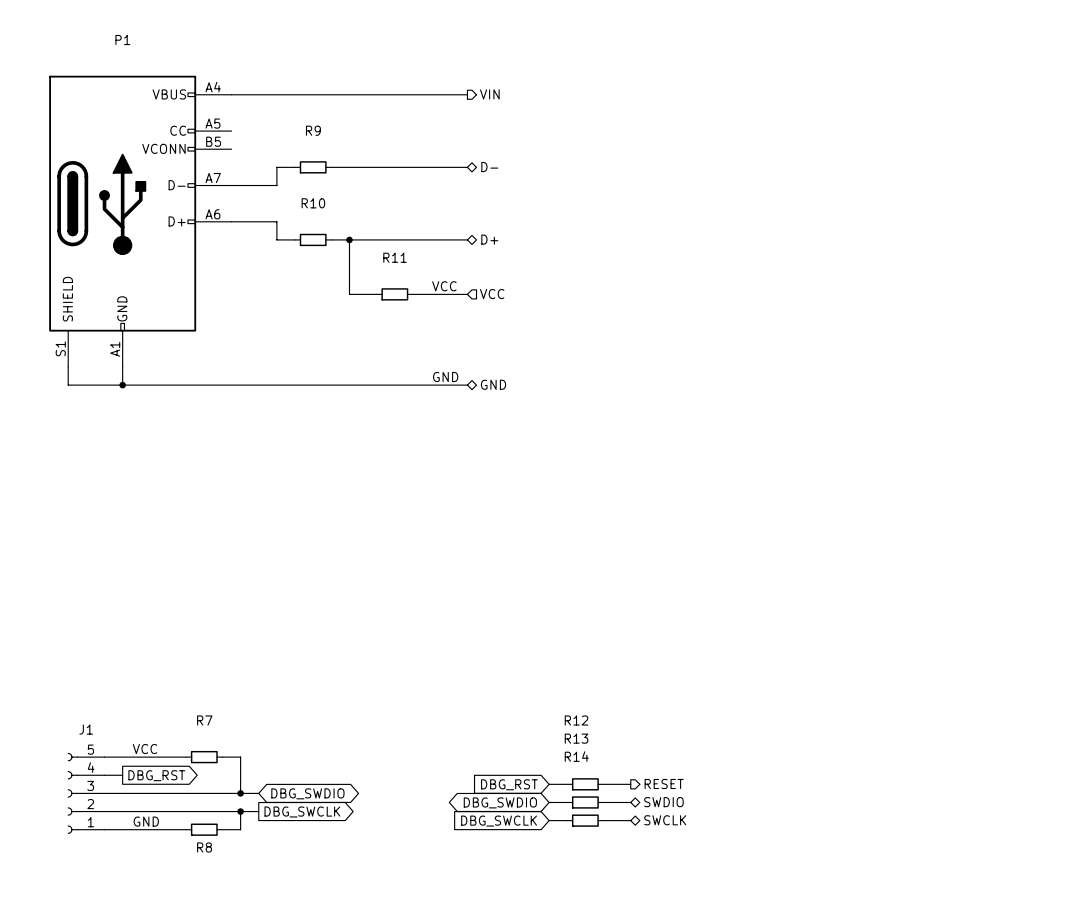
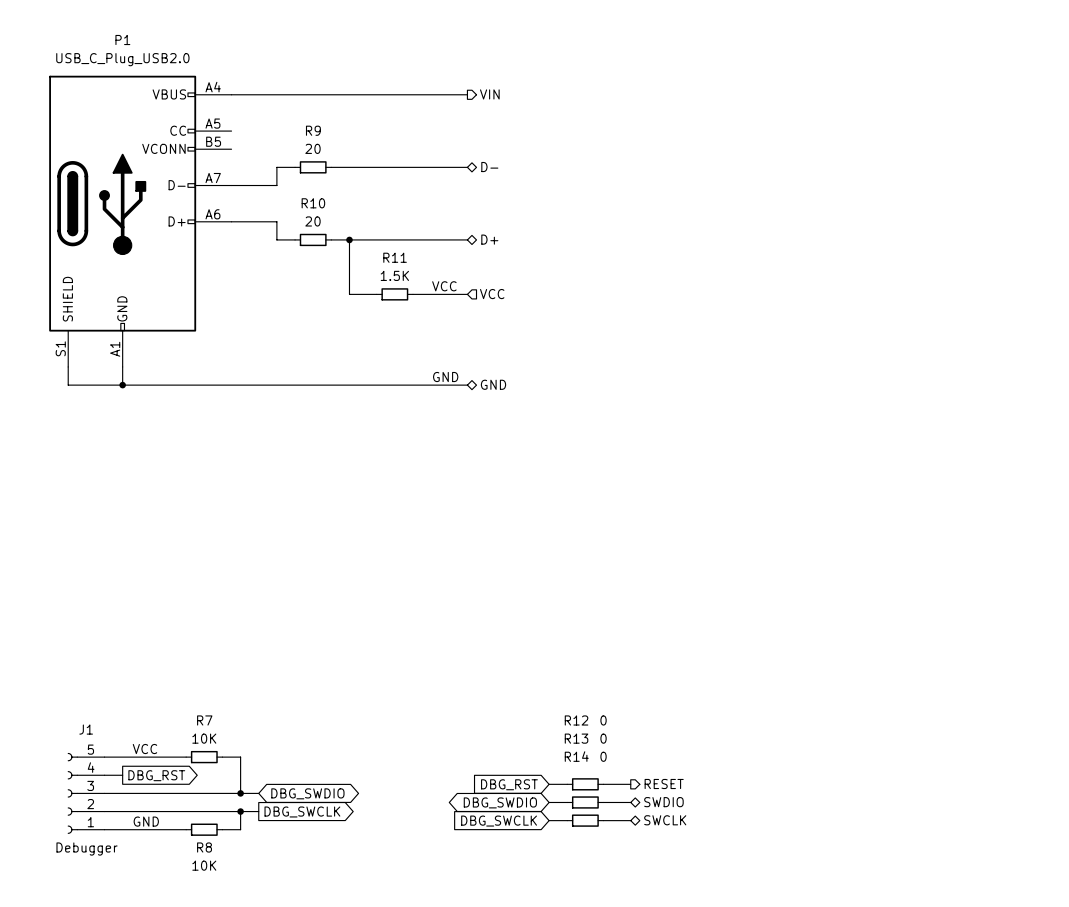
P1 value: none -> USB_C_Plug_USB2.0 (122, 59)
R9 value: none -> 20 (312, 148)
R10 value: none -> 20 (312, 221)
R11 value: none -> 1.5K (394, 275)
R12 value: none -> 0 (603, 720)
R7 value: none -> 10K (204, 738)
R13 value: none -> 0 (603, 738)
R14 value: none -> 0 (603, 756)
J1 value: none -> Debugger (87, 849)
R8 value: none -> 10K (204, 865)

